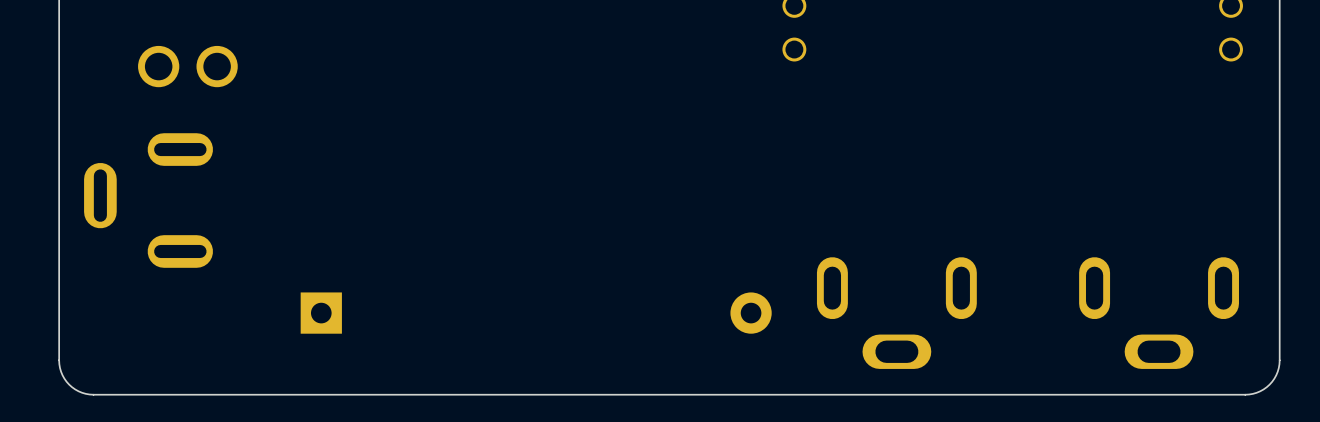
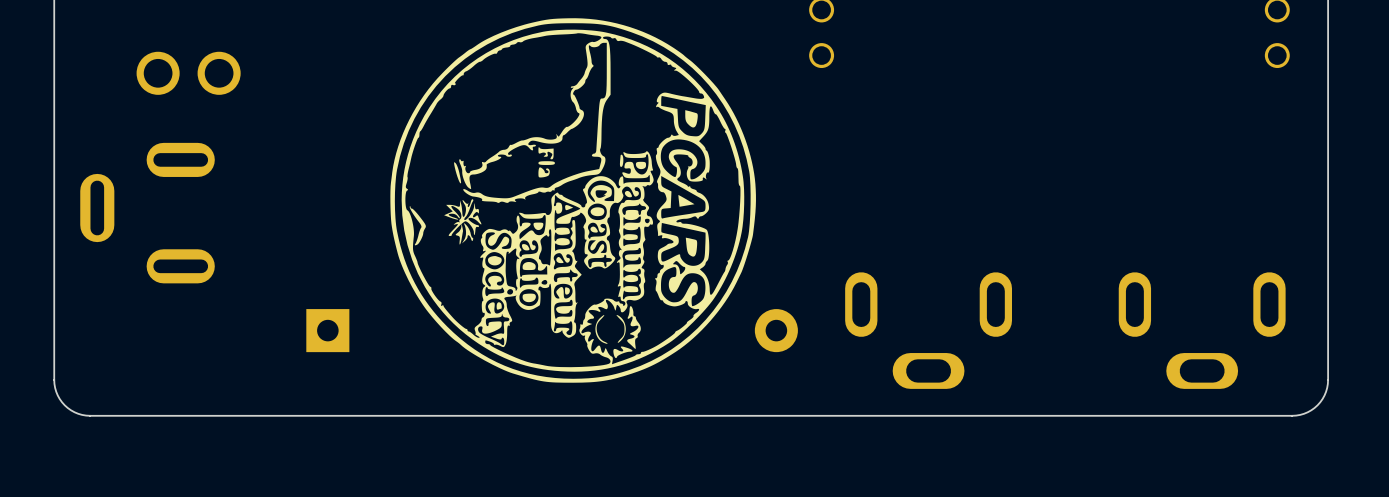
drawing: none -> [390, 18, 756, 383]

